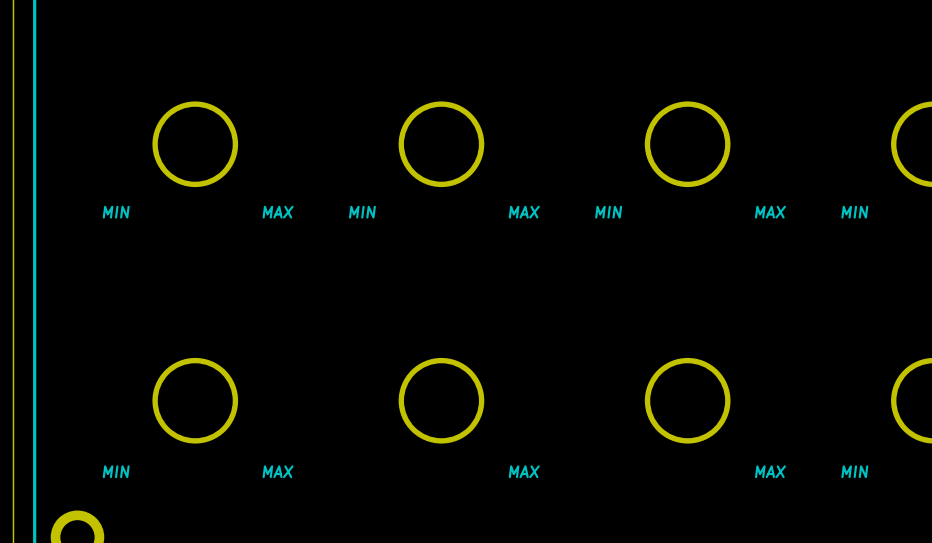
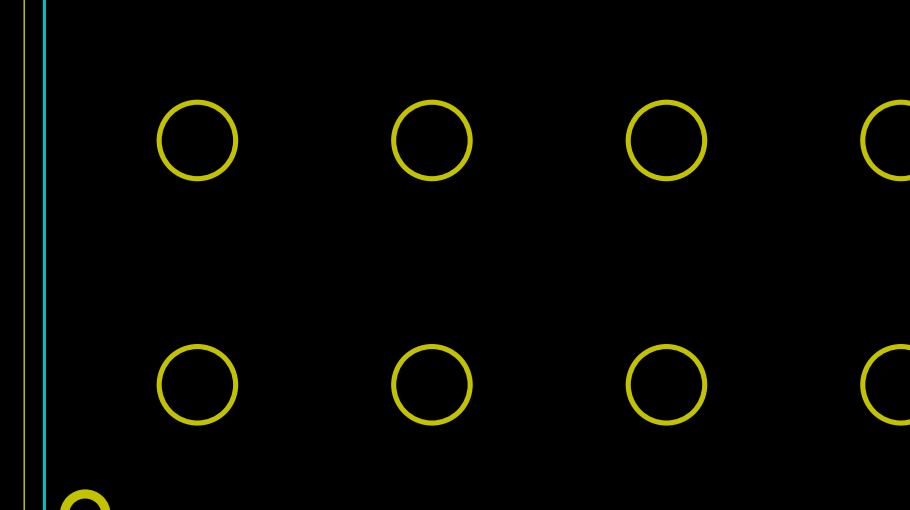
text: MIN (116, 212) -> none
text: MAX (278, 212) -> none
text: MIN (362, 212) -> none
text: MAX (524, 212) -> none
text: MIN (608, 212) -> none
text: MAX (770, 212) -> none
text: MIN (854, 212) -> none
text: MIN (116, 471) -> none
text: MAX (278, 471) -> none
text: MAX (524, 471) -> none
text: MAX (770, 471) -> none
text: MIN (854, 471) -> none

